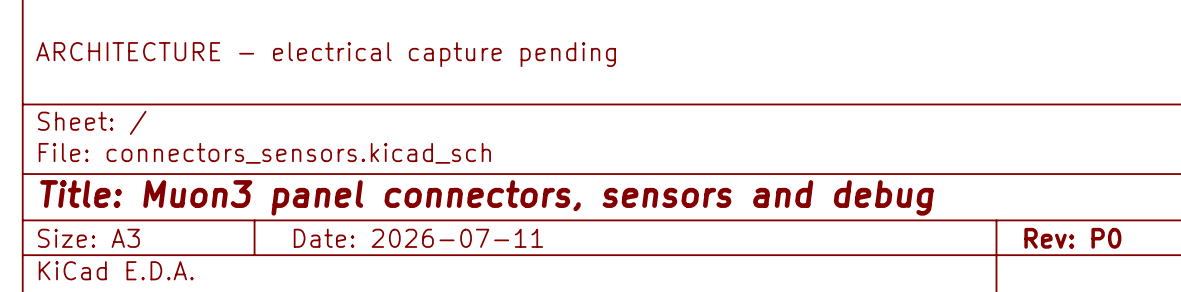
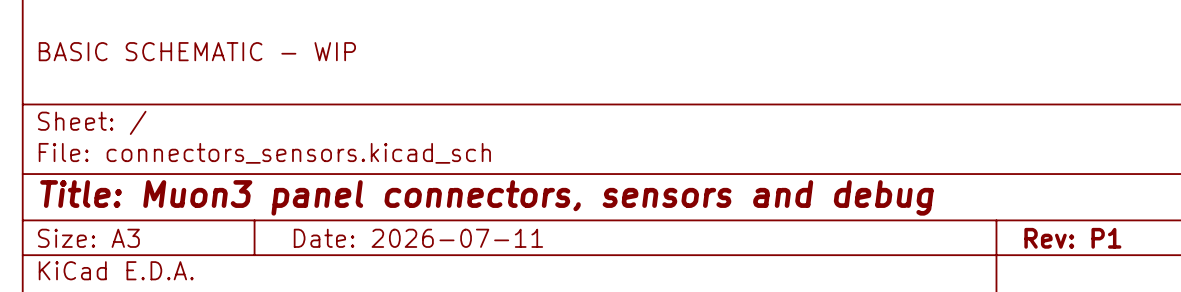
title block: ARCHITECTURE - electrical capture pending (326, 54) -> BASIC SCHEMATIC - WIP (197, 51)
title block: Rev: P0 (1072, 238) -> Rev: P1 (1072, 238)

